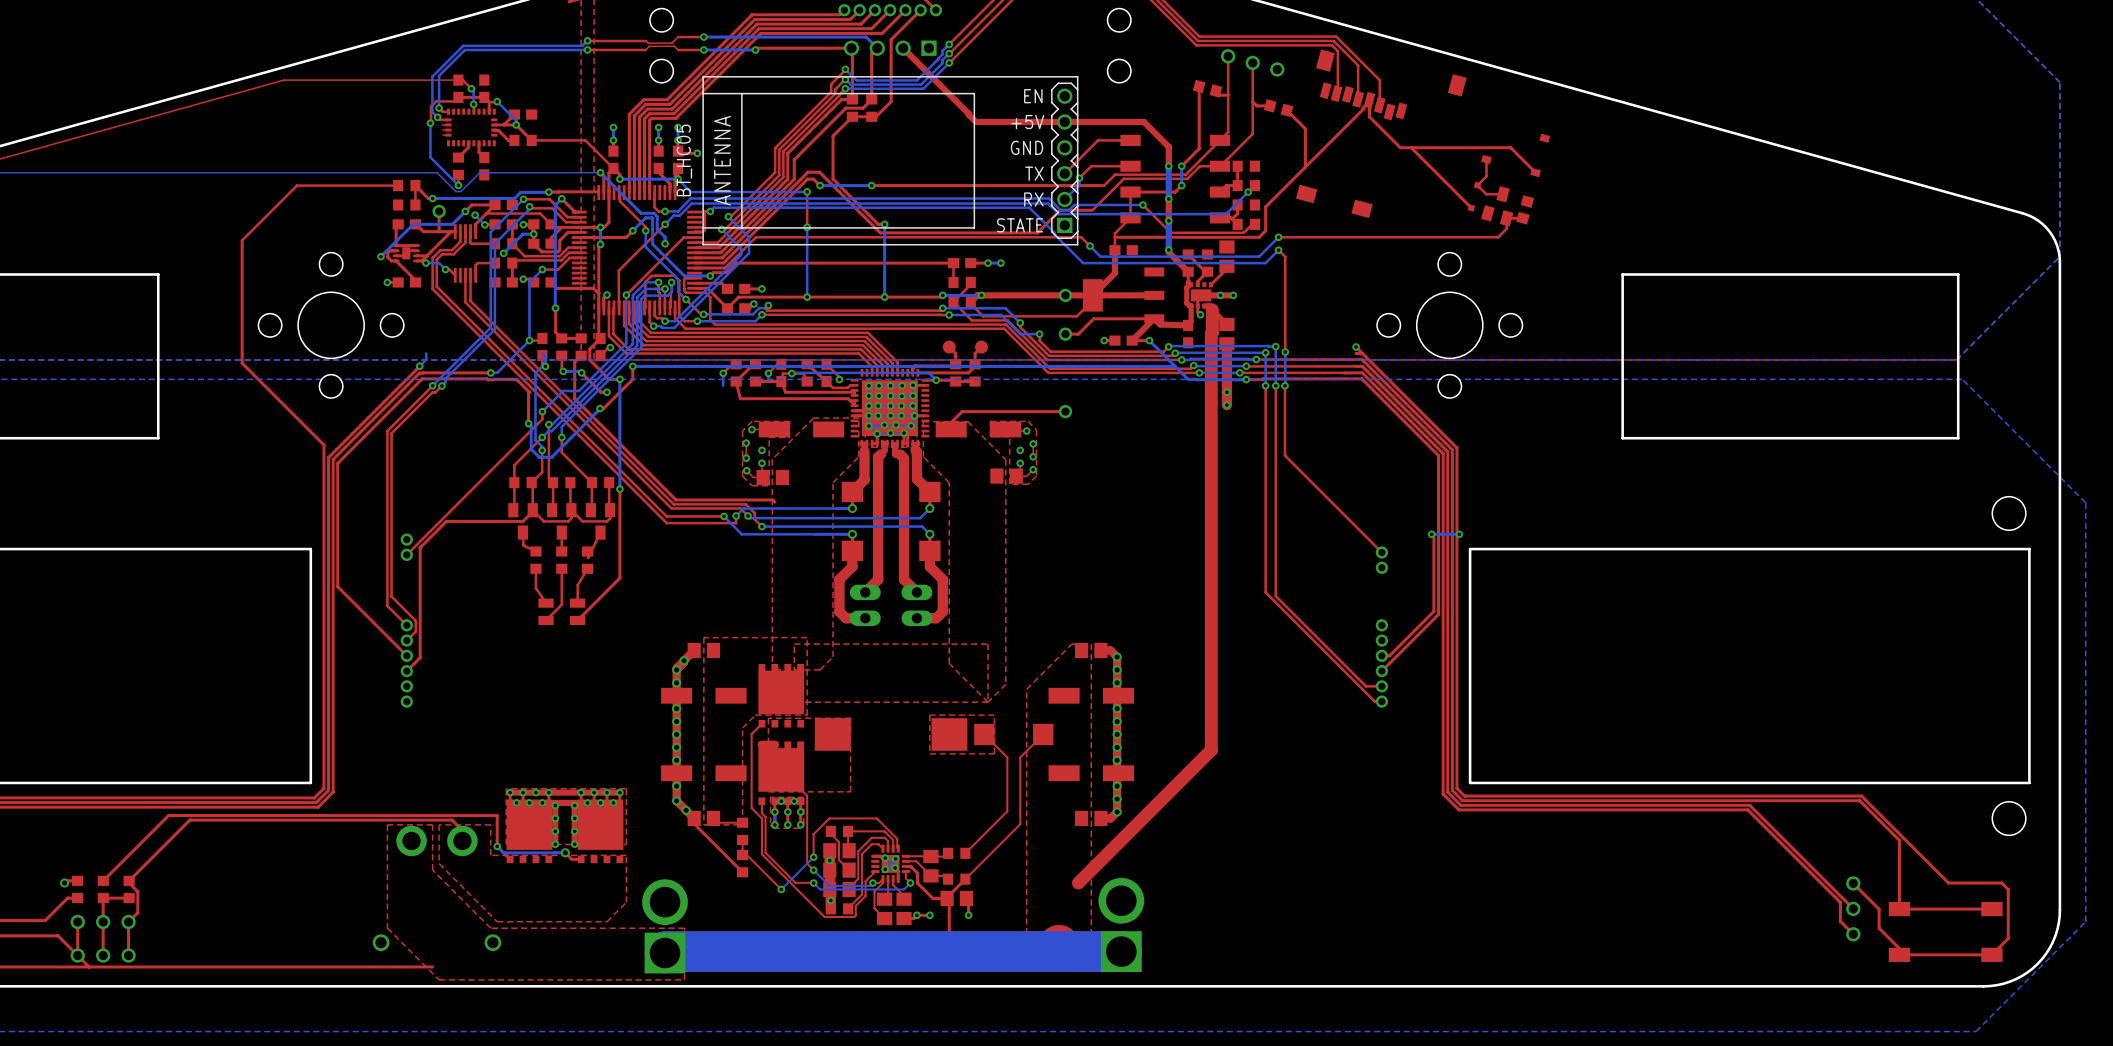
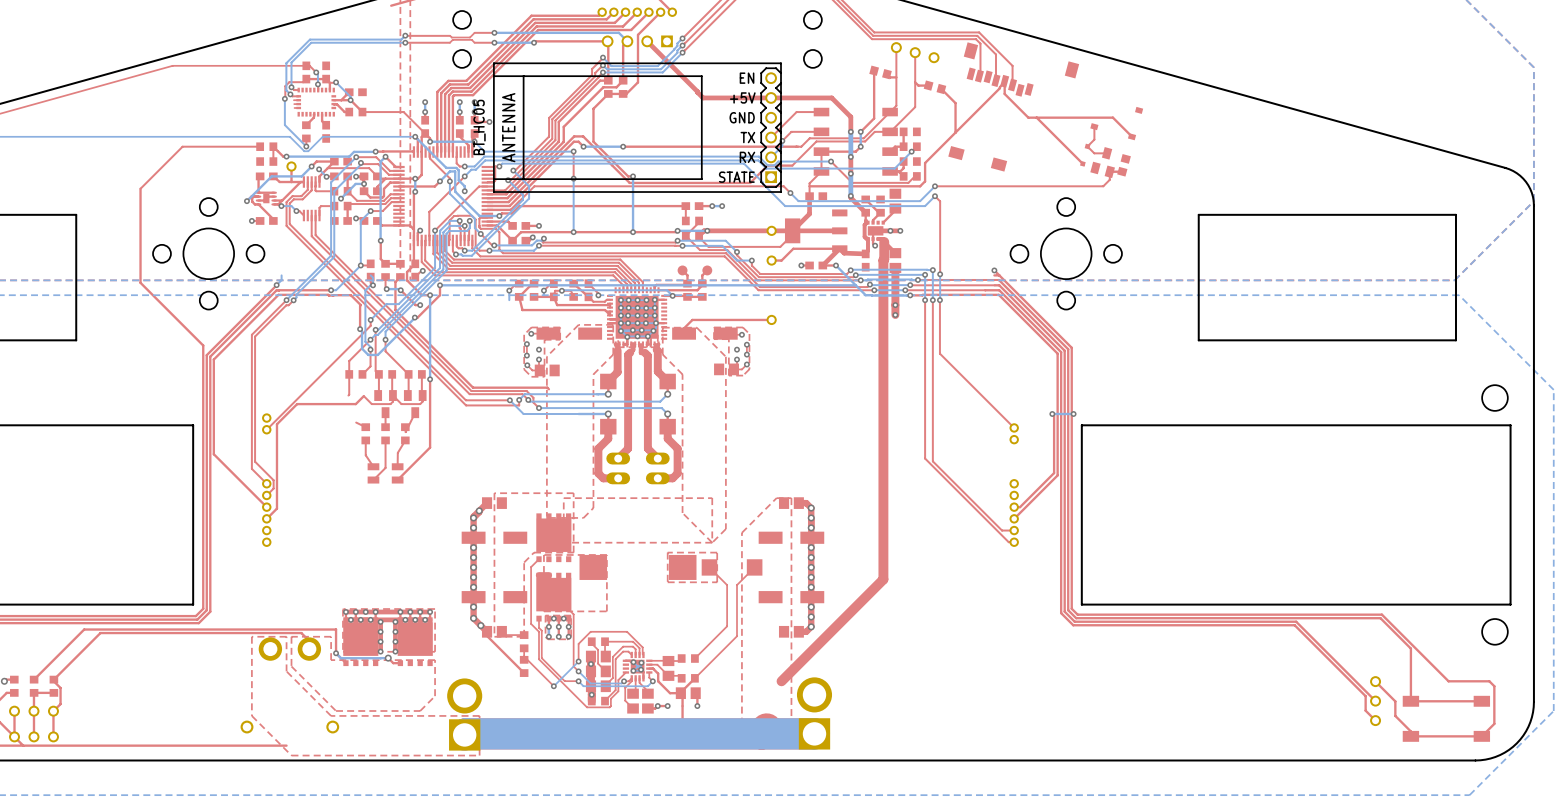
top track: (532, 483) (533, 510) -> none
part: (523, 521) -> none
top track: (523, 532) (523, 545) -> none

